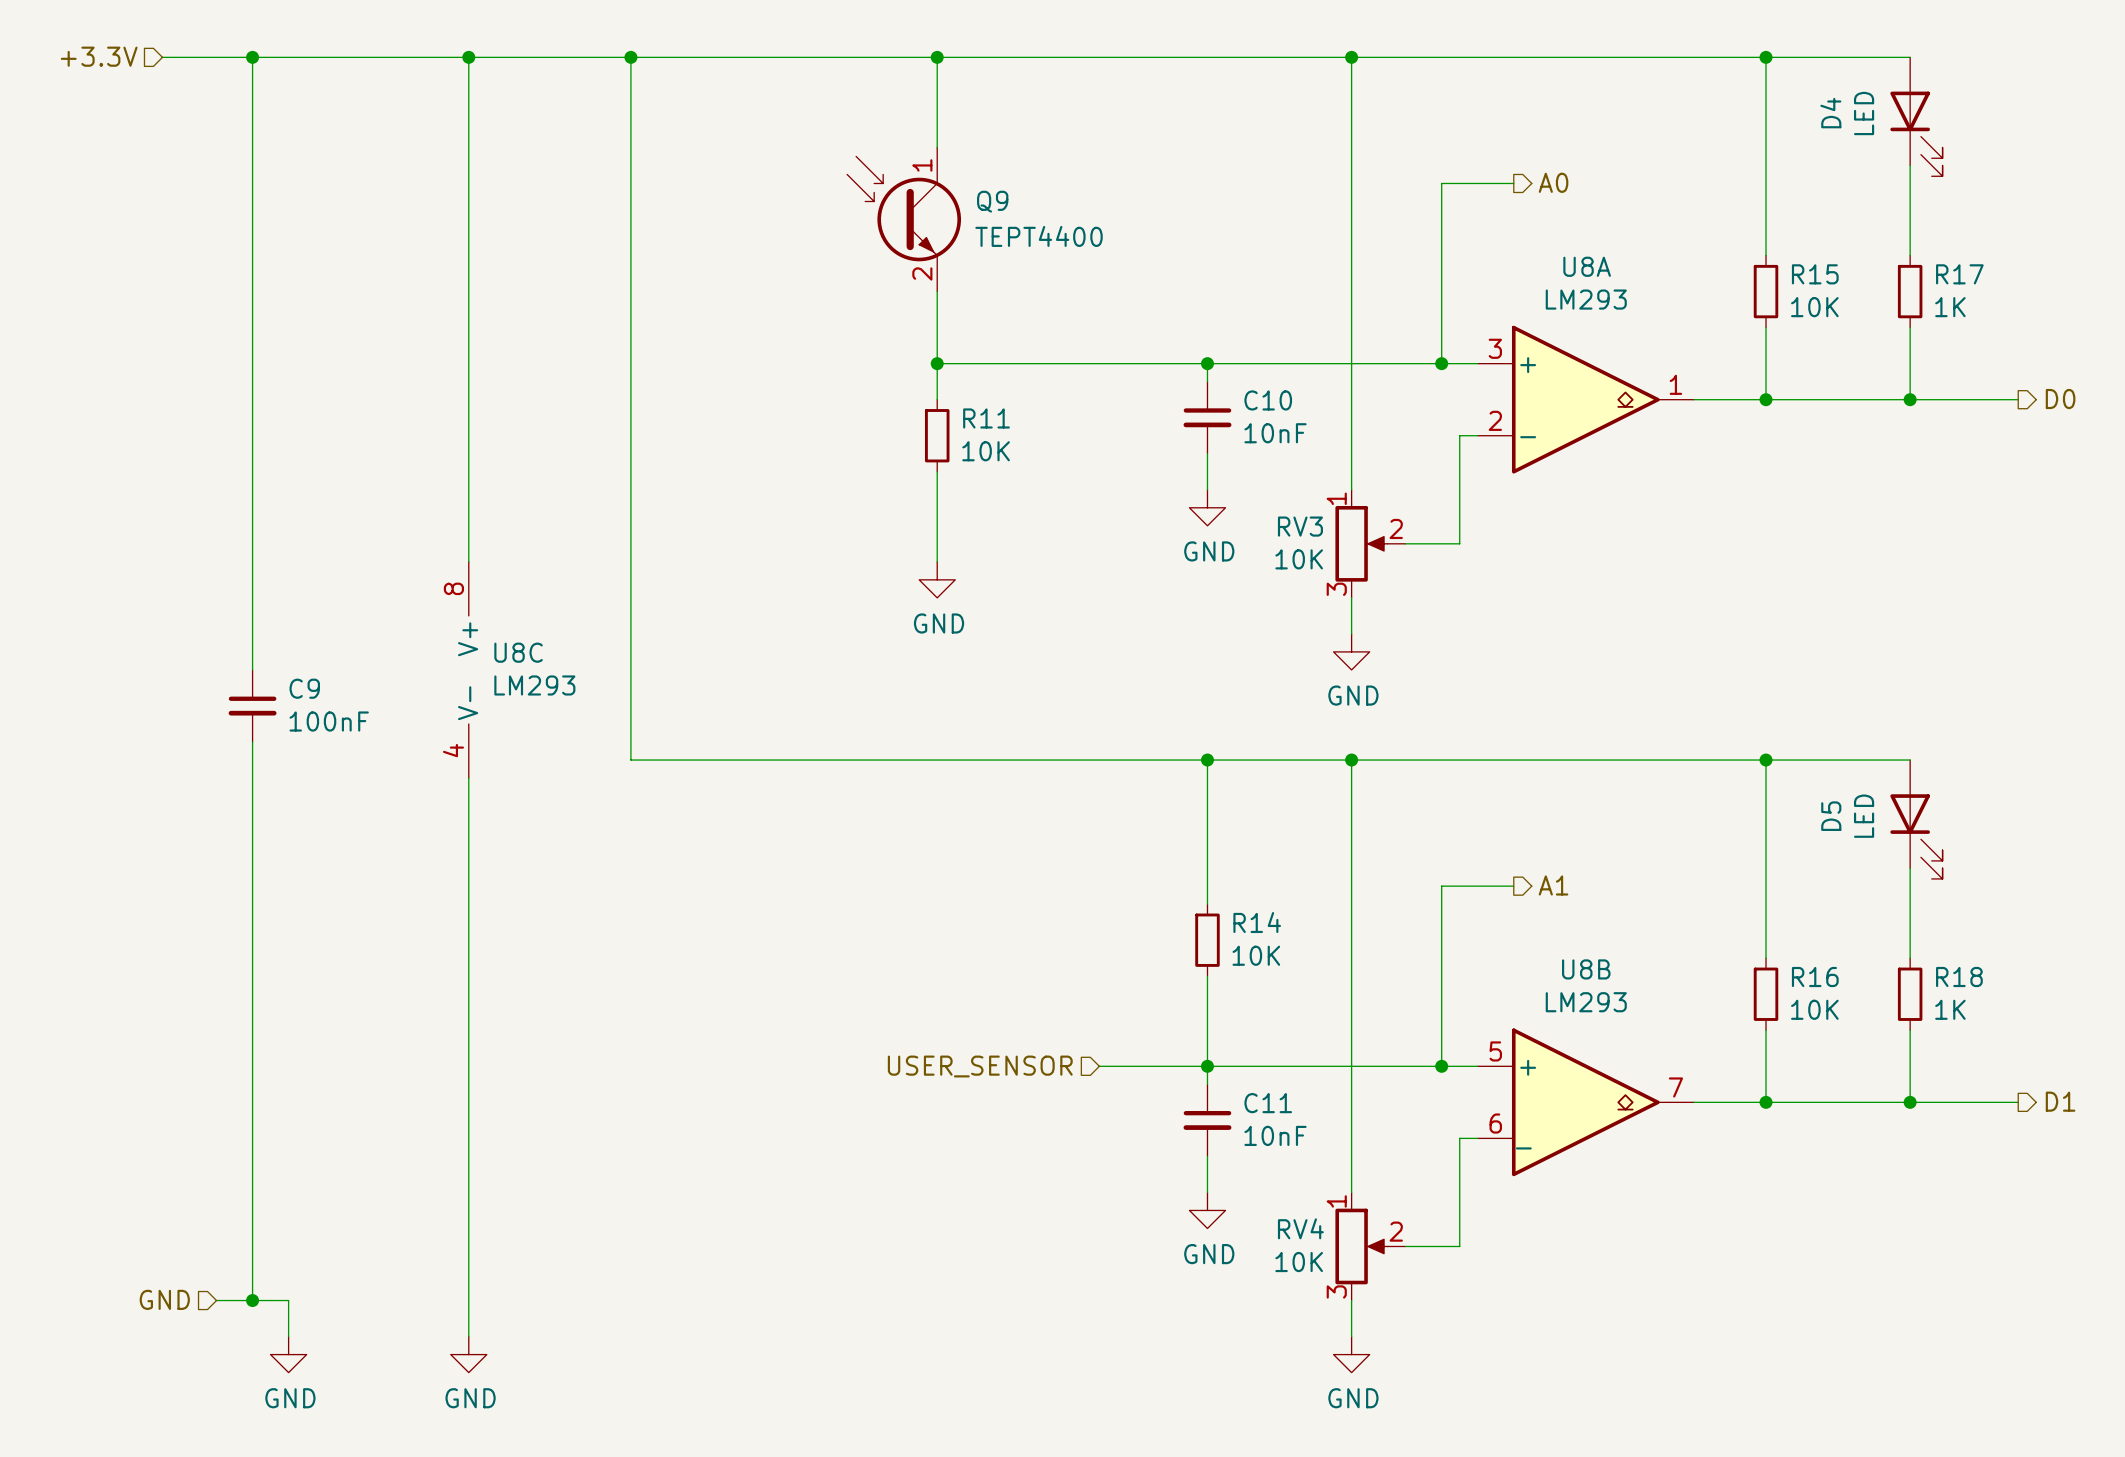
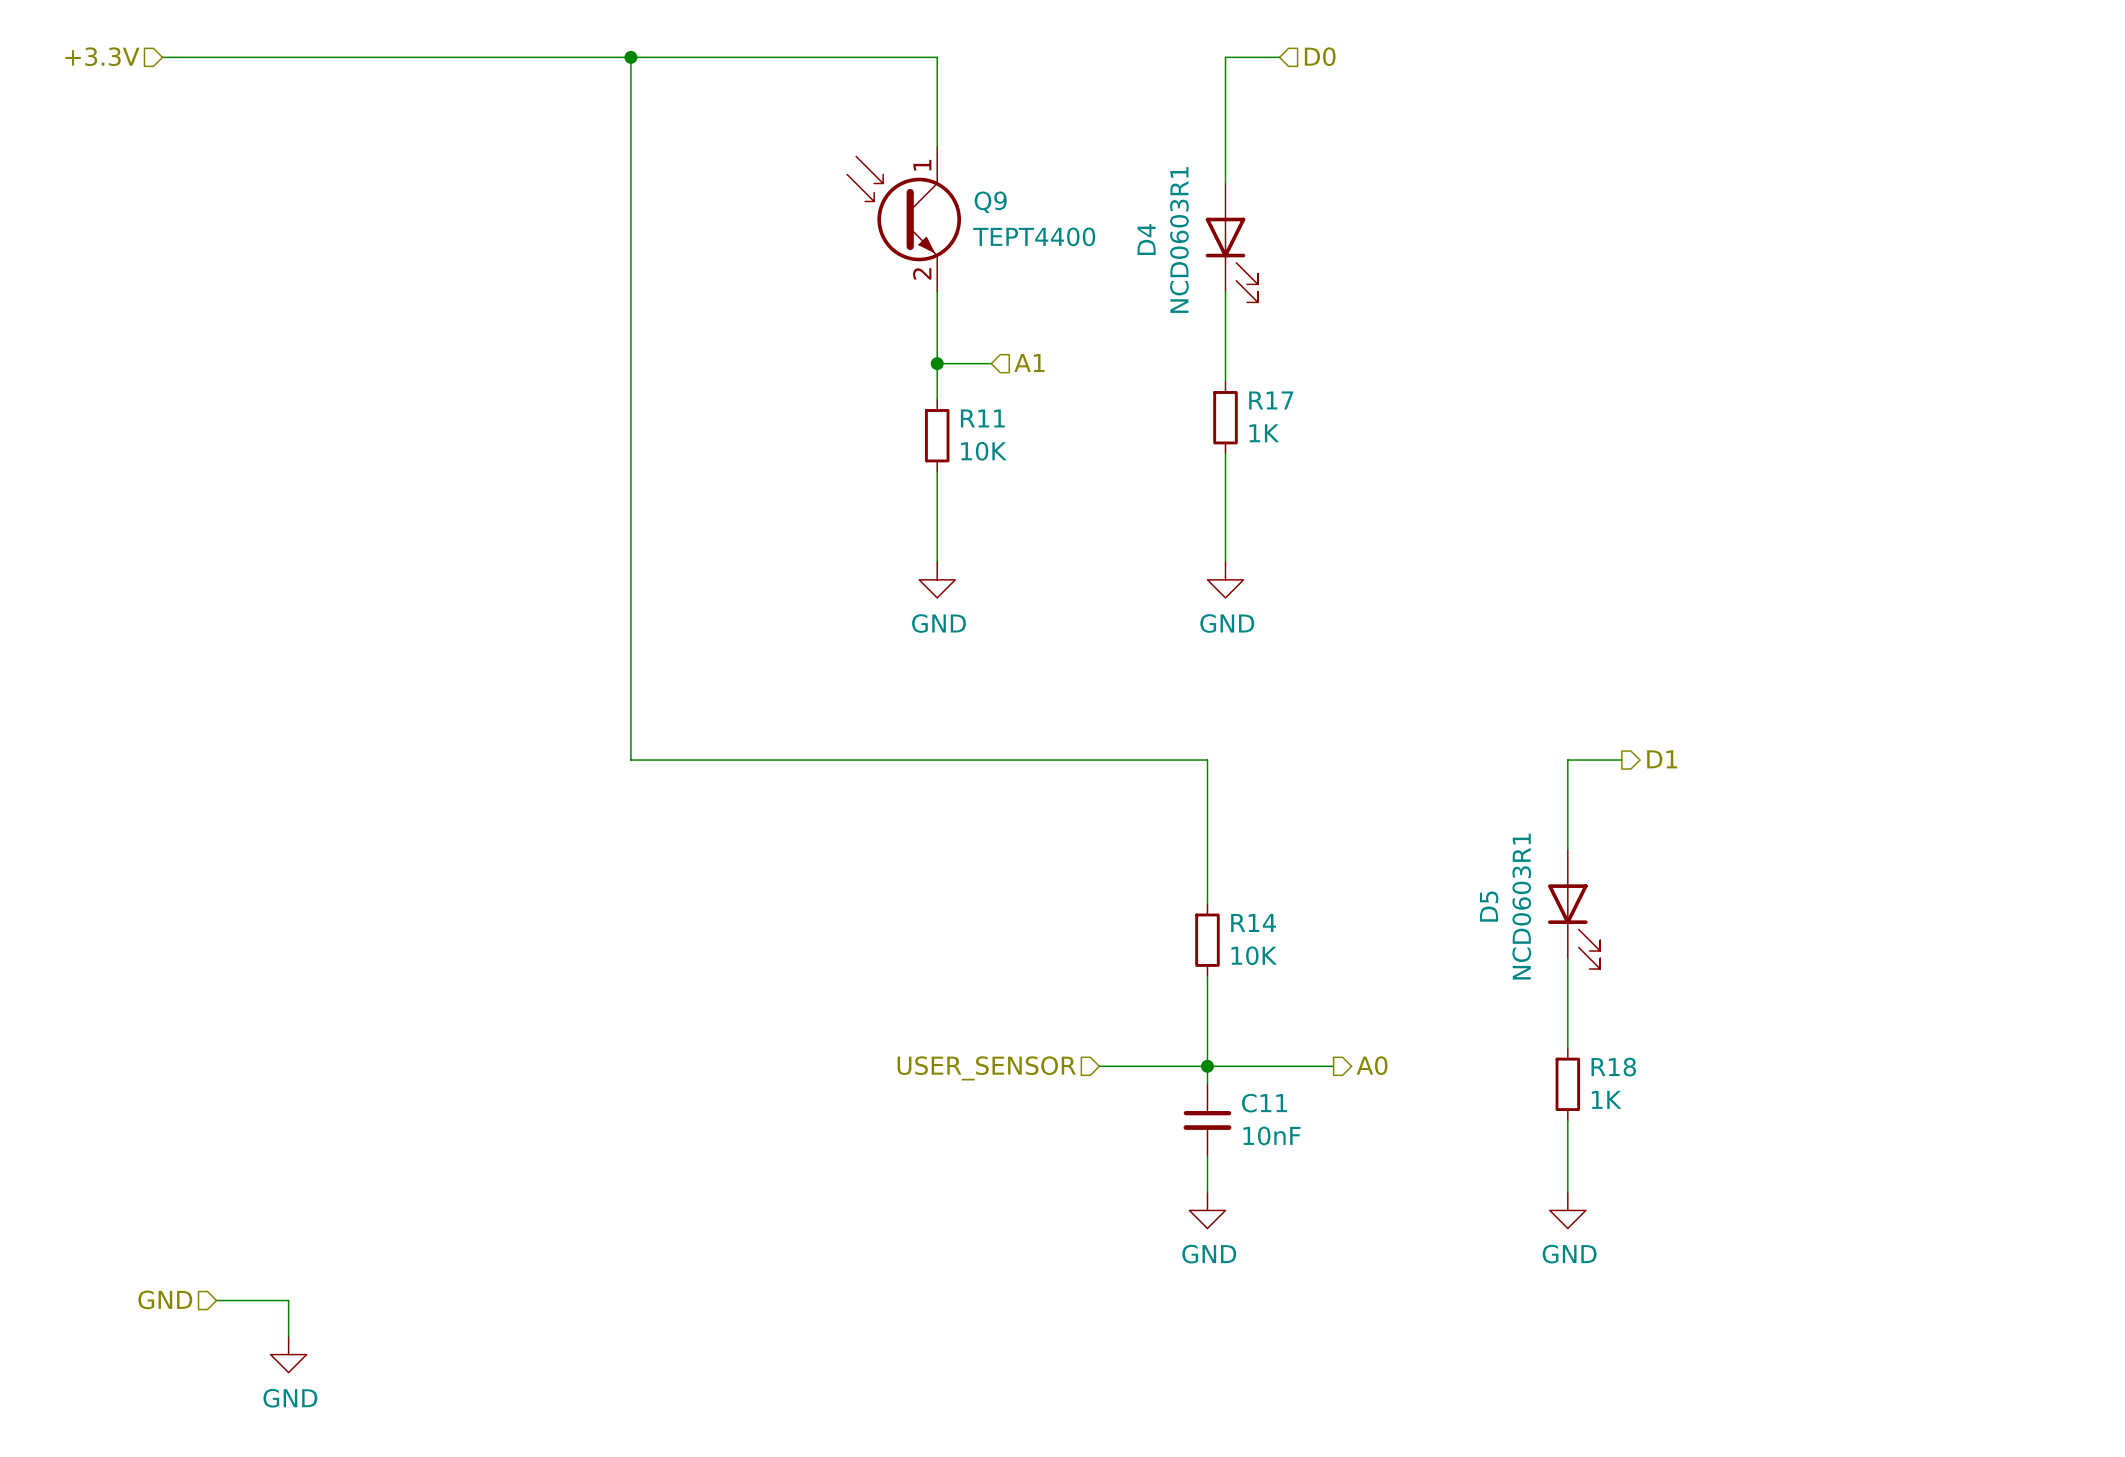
hierarchical label: none -> D0 (1320, 56)
wire: (252, 57) (252, 669) -> none
junction: (252, 57) -> none
wire: (468, 57) (468, 561) -> none
junction: (468, 57) -> none
wire: (937, 57) (1225, 57) -> (1225, 183) (1225, 57)
junction: (937, 57) -> none
wire: (1279, 57) (1910, 57) -> none
wire: (1351, 57) (1351, 489) -> none
junction: (1351, 57) -> none
wire: (1766, 57) (1766, 255) -> none
junction: (1766, 57) -> none
D4 value: LED (1864, 113) -> NCD0603R1 (1179, 239)
D4 position: (1916, 116) -> (1231, 242)
wire: (1910, 165) (1910, 255) -> none
hierarchical label: A0 (1553, 182) -> none
wire: (1513, 183) (1441, 183) (1441, 363) -> none
wire: none -> (1225, 291) (1225, 381)
R15: 10K (1766, 291) -> none
R17 position: (1910, 291) -> (1225, 417)
wire: (1766, 327) (1766, 399) -> none
wire: (1910, 327) (1910, 399) -> none
hierarchical label: none -> A1 (1029, 362)
wire: (991, 363) (1477, 363) -> none
wire: (1207, 363) (1207, 381) -> none
junction: (1207, 363) -> none
junction: (1441, 363) -> none
U8A: LM293 (1585, 399) -> none
wire: (1693, 399) (2018, 399) -> none
junction: (1766, 399) -> none
junction: (1910, 399) -> none
hierarchical label: D0 (2060, 399) -> none
C10: 10nF (1207, 417) -> none
wire: (1477, 435) (1459, 435) (1459, 543) (1405, 543) -> none
wire: (1207, 453) (1207, 489) -> none
wire: none -> (1225, 453) (1225, 561)
power symbol: GND (1207, 507) -> none
RV3: 10K (1370, 543) -> none
power symbol: none -> GND (1225, 579)
wire: (1351, 597) (1351, 633) -> none
power symbol: GND (1351, 651) -> none
U8C: LM293 (468, 669) -> none
C9: 100nF (252, 705) -> none
wire: (252, 742) (252, 1300) -> none
hierarchical label: none -> D1 (1662, 759)
wire: (1207, 760) (1567, 760) -> (1567, 850) (1567, 760)
junction: (1207, 760) -> none
wire: (1351, 760) (1351, 1192) -> none
junction: (1351, 760) -> none
wire: (1621, 760) (1910, 760) -> none
wire: (1766, 760) (1766, 958) -> none
junction: (1766, 760) -> none
wire: (468, 778) (468, 1336) -> none
D5 value: LED (1864, 816) -> NCD0603R1 (1521, 906)
D5 position: (1916, 819) -> (1574, 909)
wire: (1910, 868) (1910, 958) -> (1567, 958) (1567, 1048)
hierarchical label: A1 (1553, 885) -> none
wire: (1513, 886) (1441, 886) (1441, 1066) -> none
R16: 10K (1766, 994) -> none
R18 position: (1910, 994) -> (1567, 1084)
wire: (1766, 1030) (1766, 1102) -> none
wire: (1910, 1030) (1910, 1102) -> (1567, 1120) (1567, 1192)
hierarchical label: none -> A0 (1372, 1065)
wire: (1333, 1066) (1477, 1066) -> none
junction: (1441, 1066) -> none
hierarchical label: D1 (2060, 1101) -> none
U8B: LM293 (1585, 1102) -> none
wire: (1693, 1102) (2018, 1102) -> none
junction: (1766, 1102) -> none
junction: (1910, 1102) -> none
wire: (1477, 1138) (1459, 1138) (1459, 1246) (1405, 1246) -> none
RV4: 10K (1370, 1246) -> none
junction: (252, 1300) -> none
wire: (1351, 1300) (1351, 1336) -> none
power symbol: GND (468, 1354) -> none
power symbol position: GND (1351, 1354) -> GND (1567, 1210)

